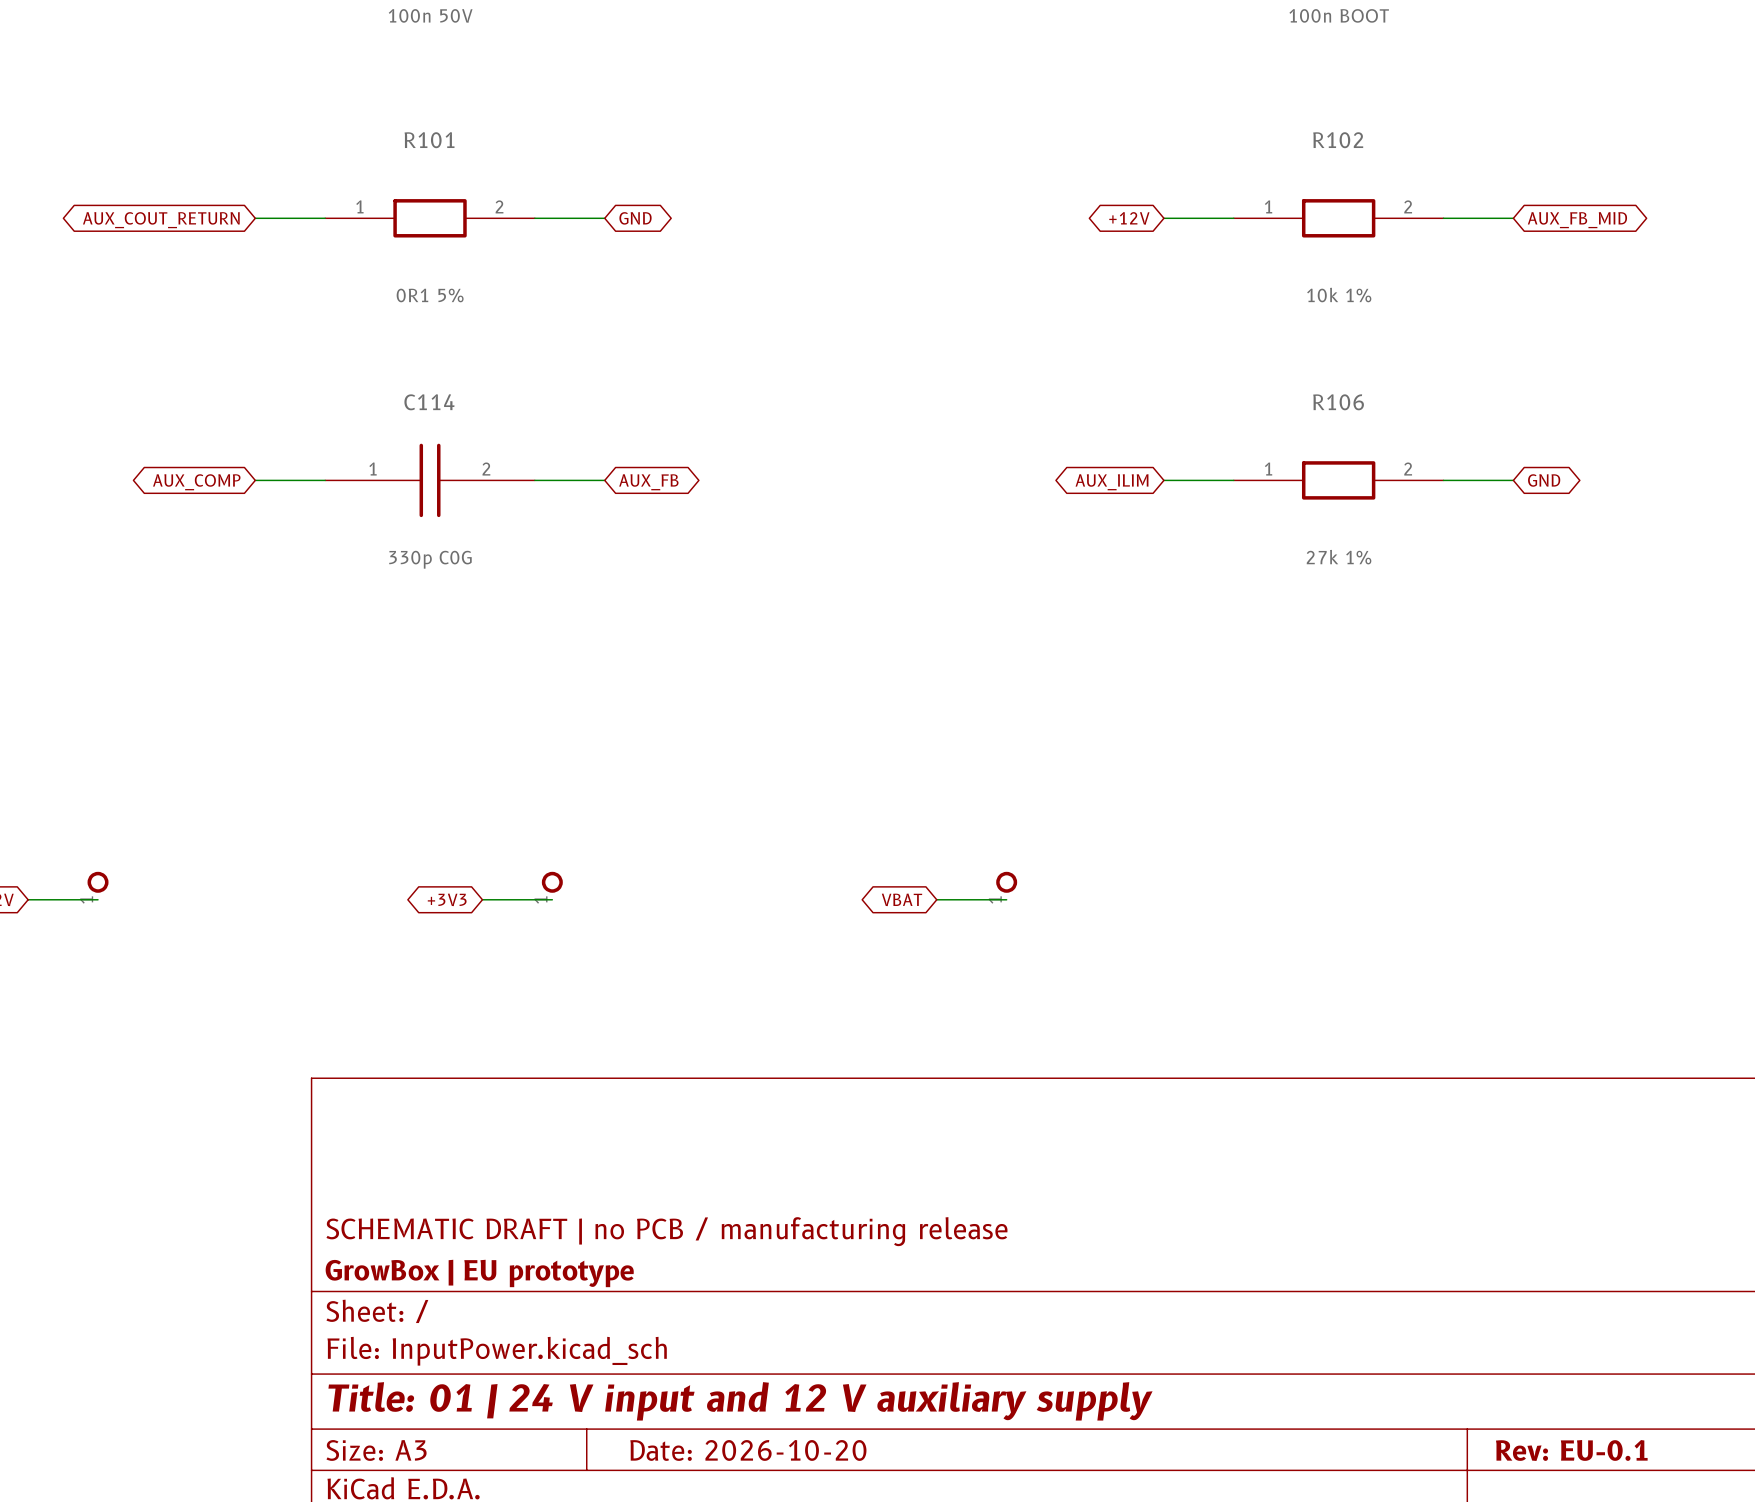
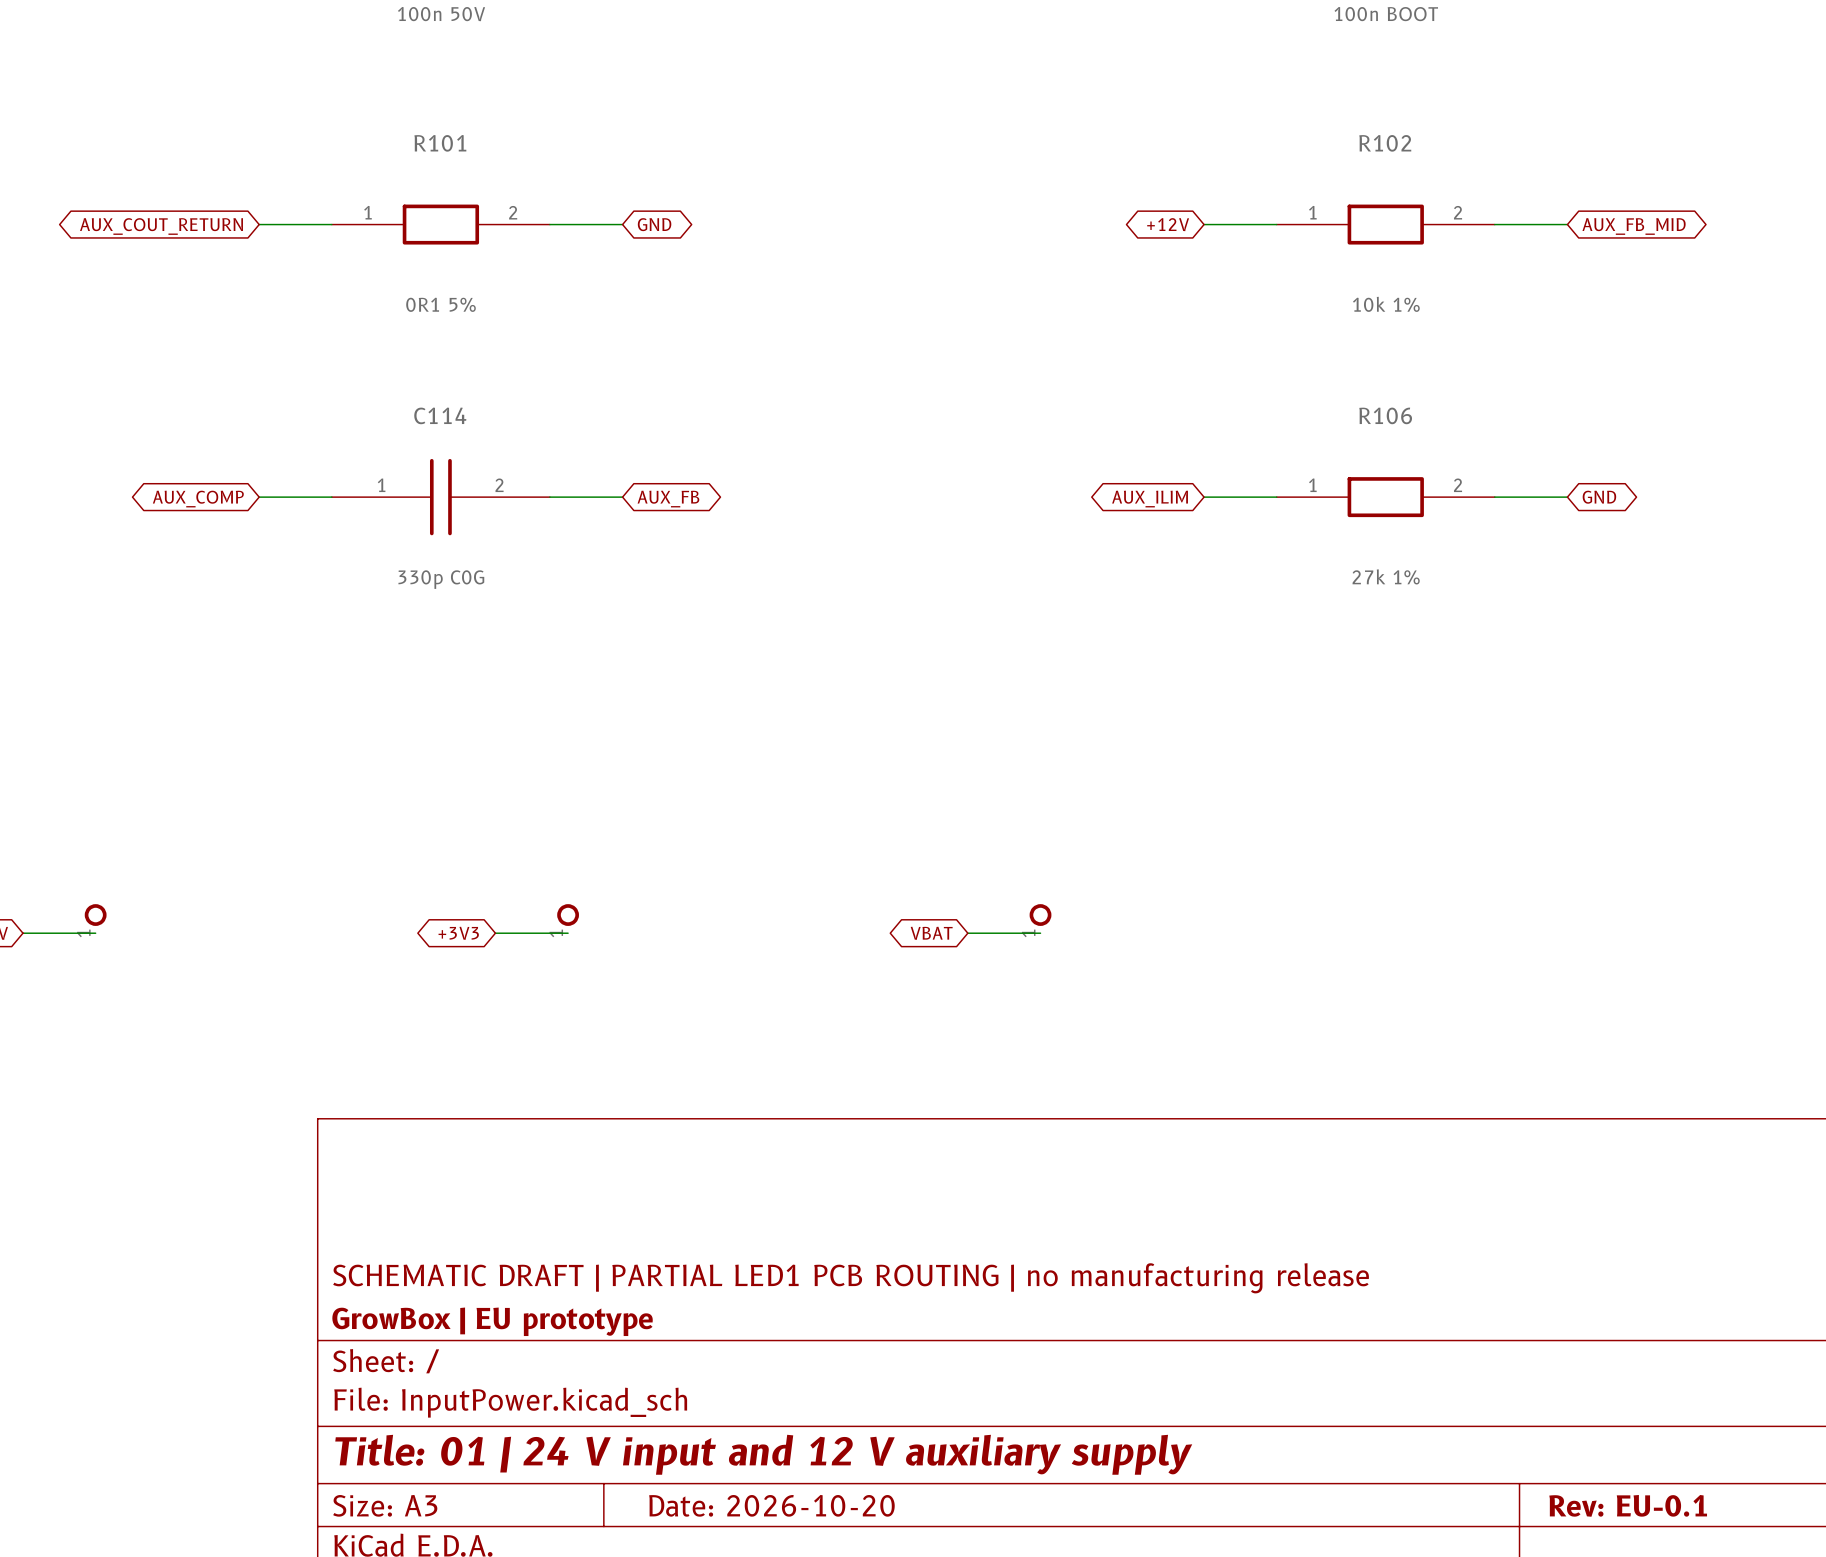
title block: SCHEMATIC DRAFT | no PCB / manufacturing release (666, 1231) -> SCHEMATIC DRAFT | PARTIAL LED1 PCB ROUTING | no manufacturing release (851, 1278)

